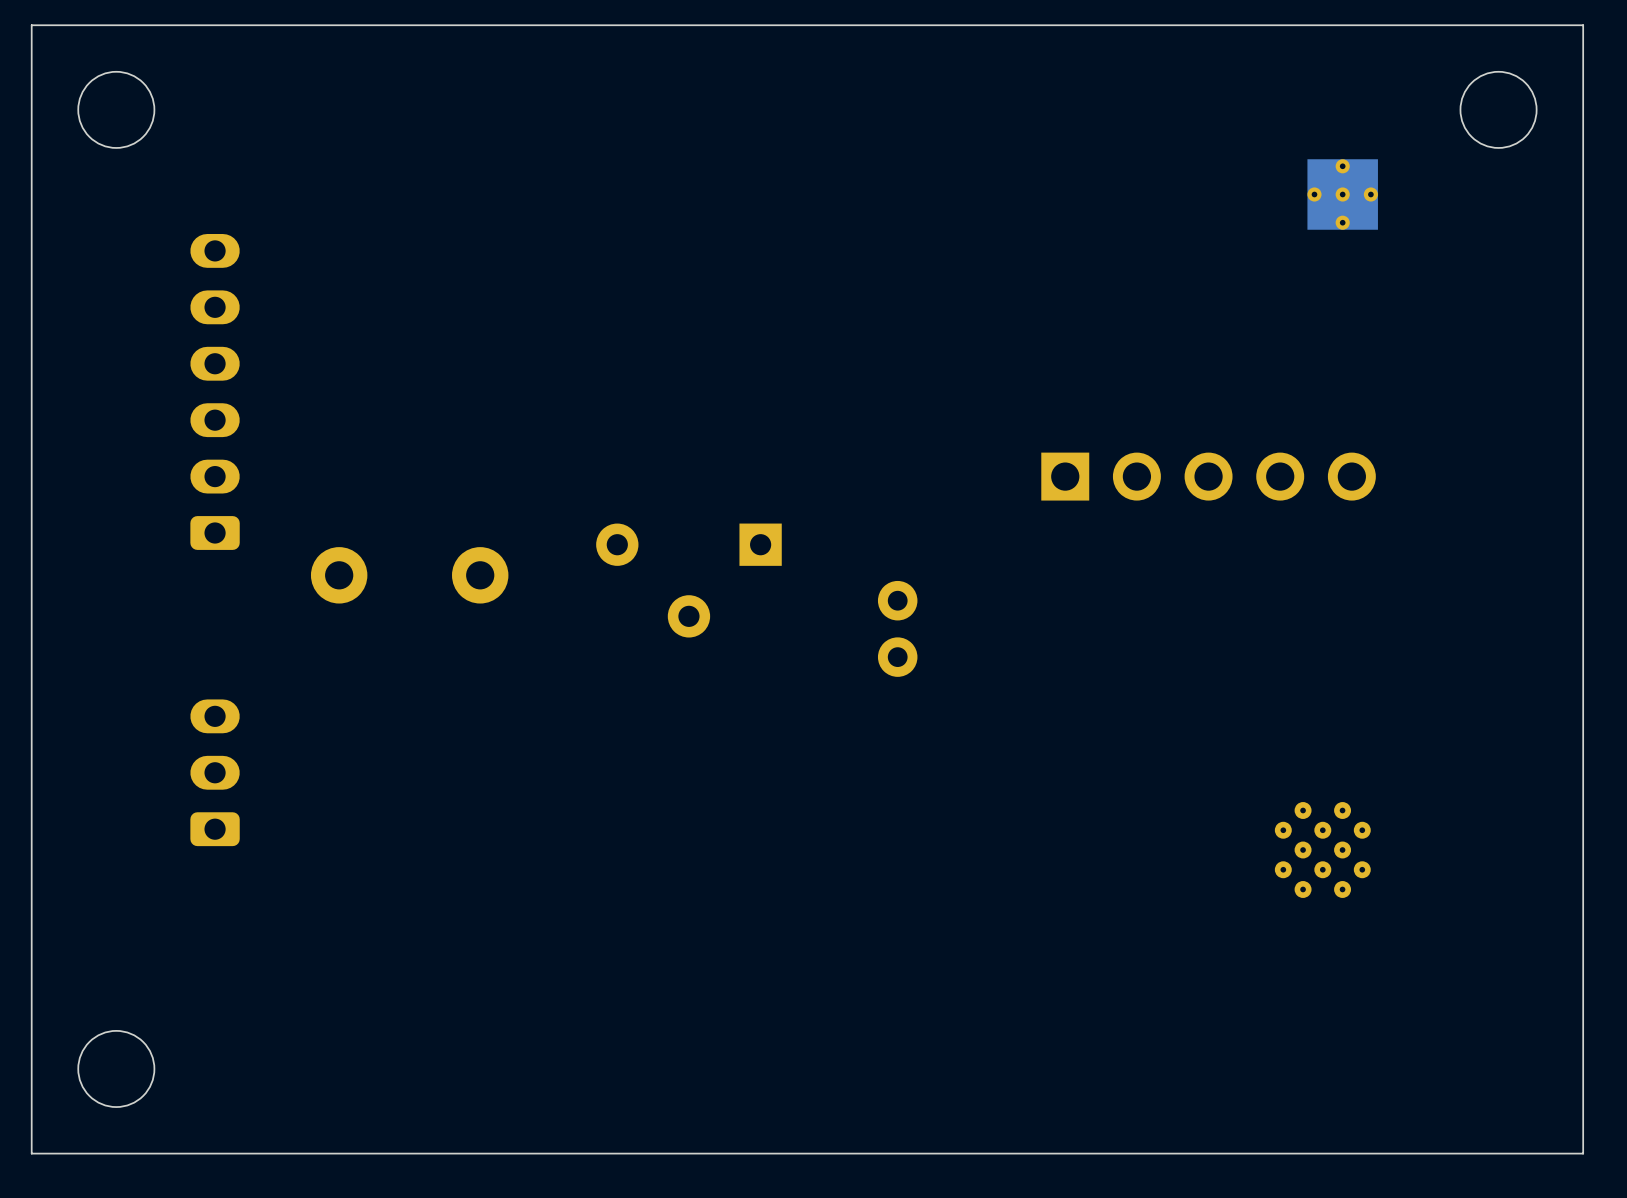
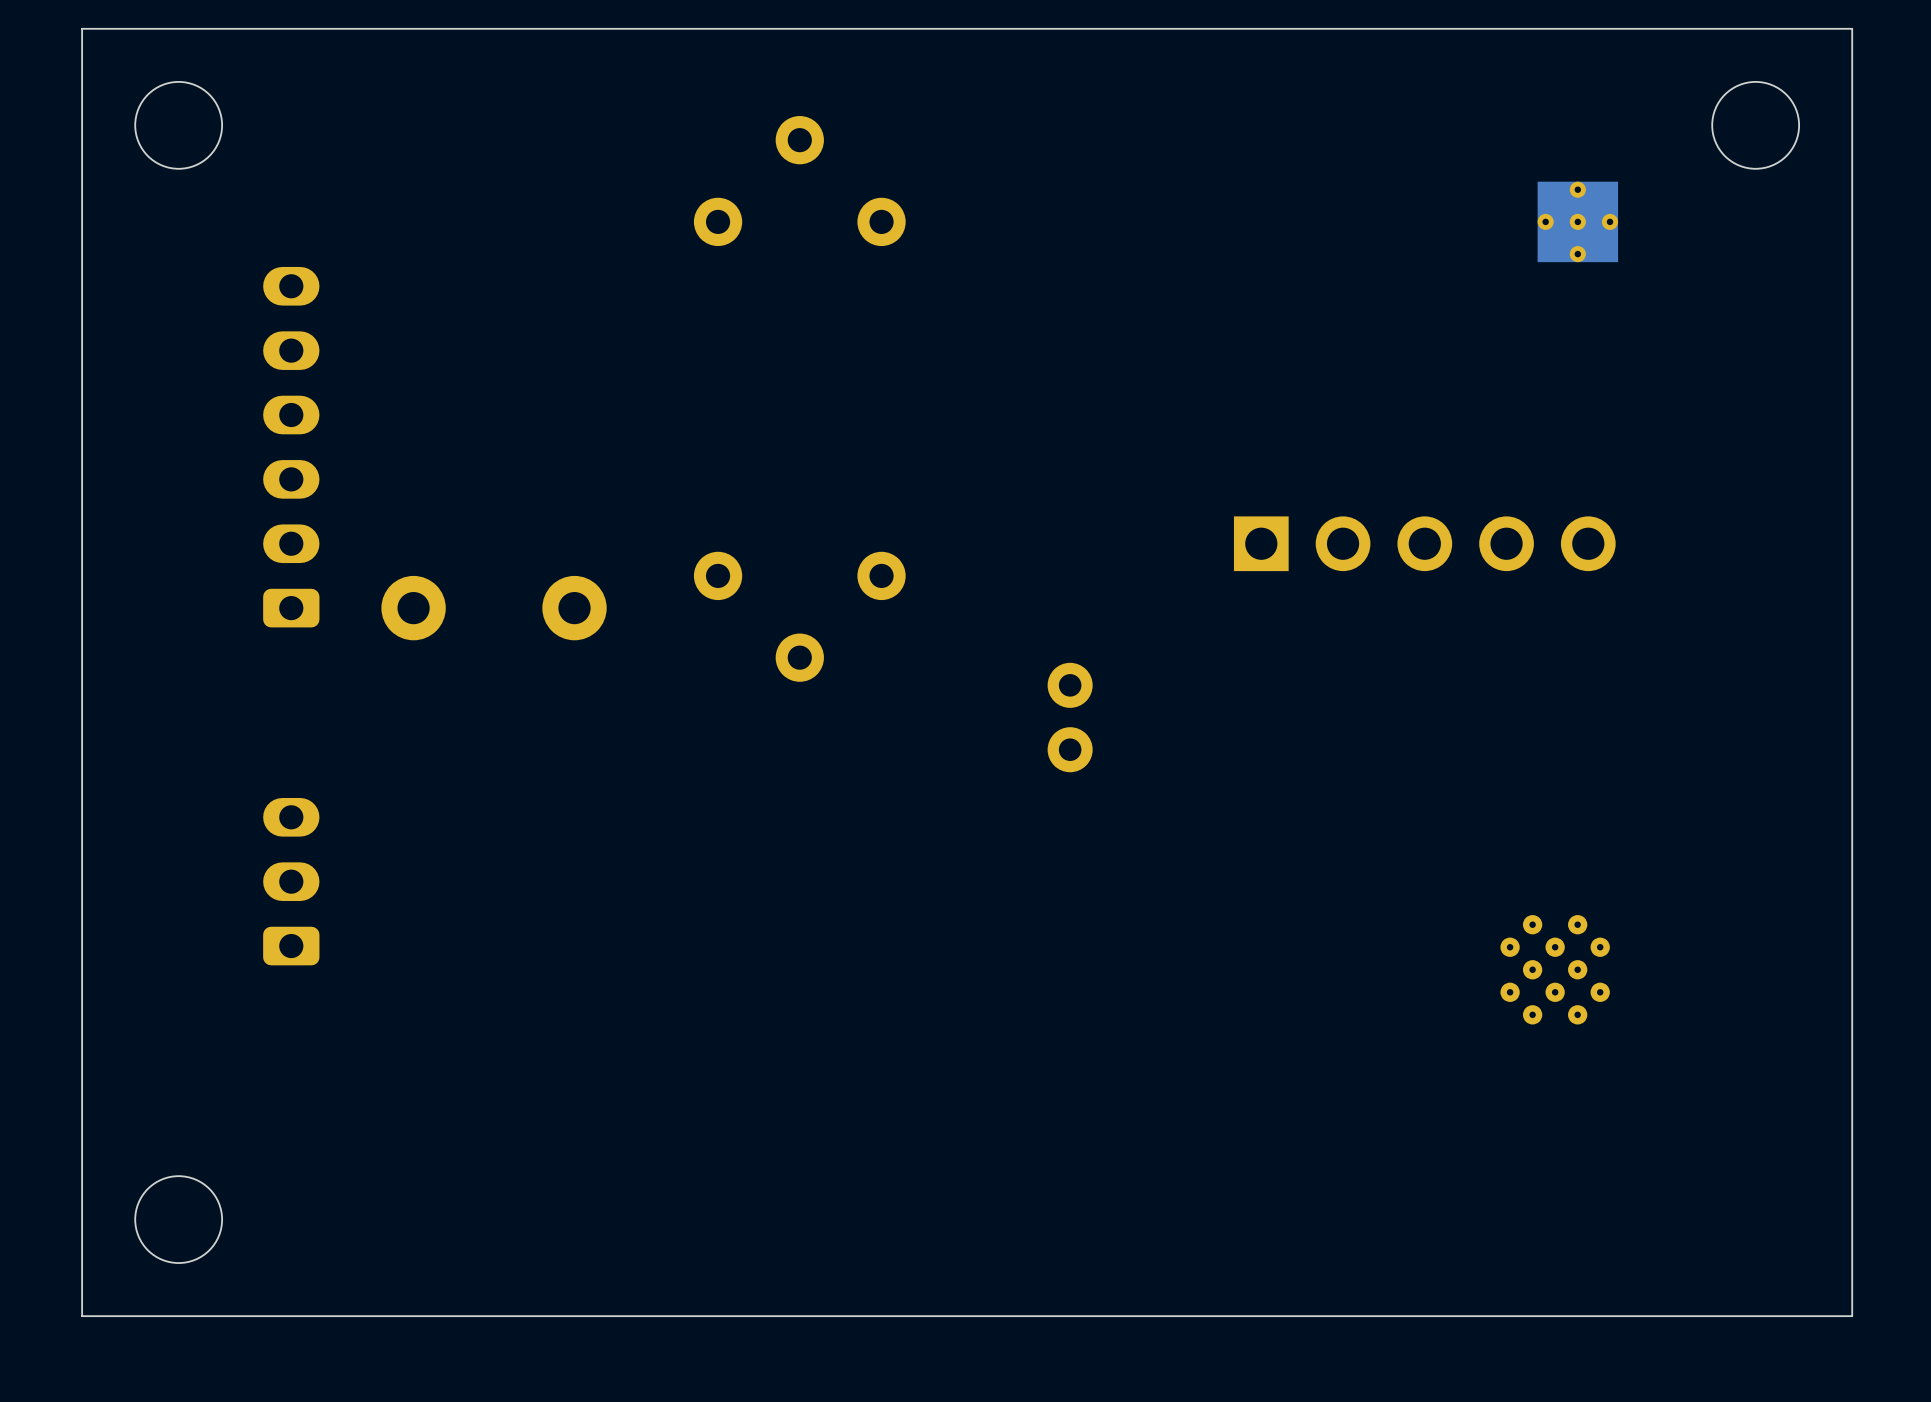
part: none -> (799, 181)
part: none -> (799, 616)
part position: (339, 575) -> (413, 608)
part position: (480, 575) -> (574, 608)
part: (688, 580) -> none

